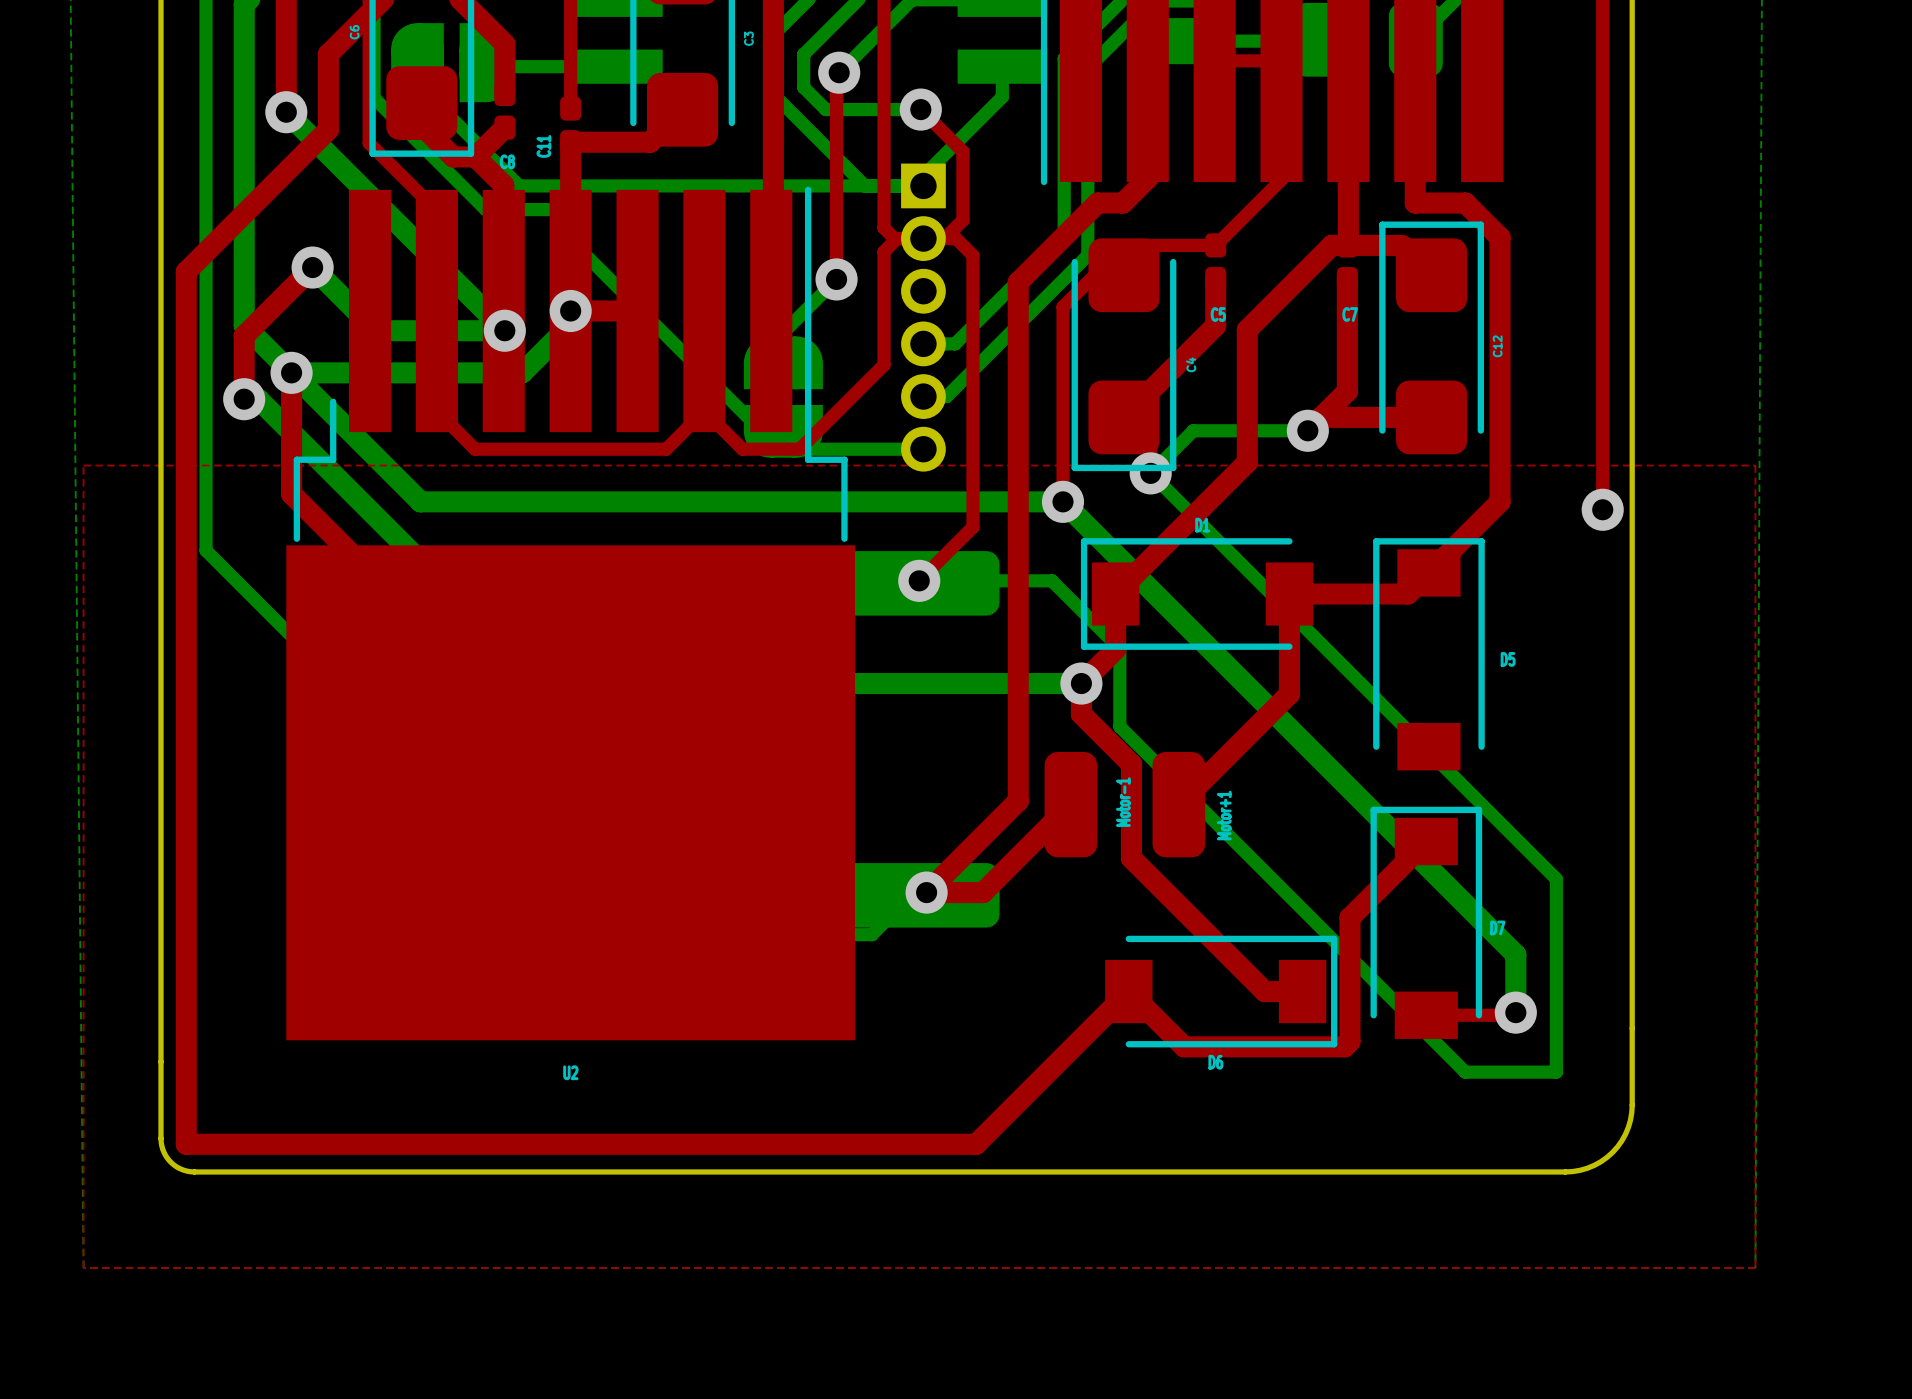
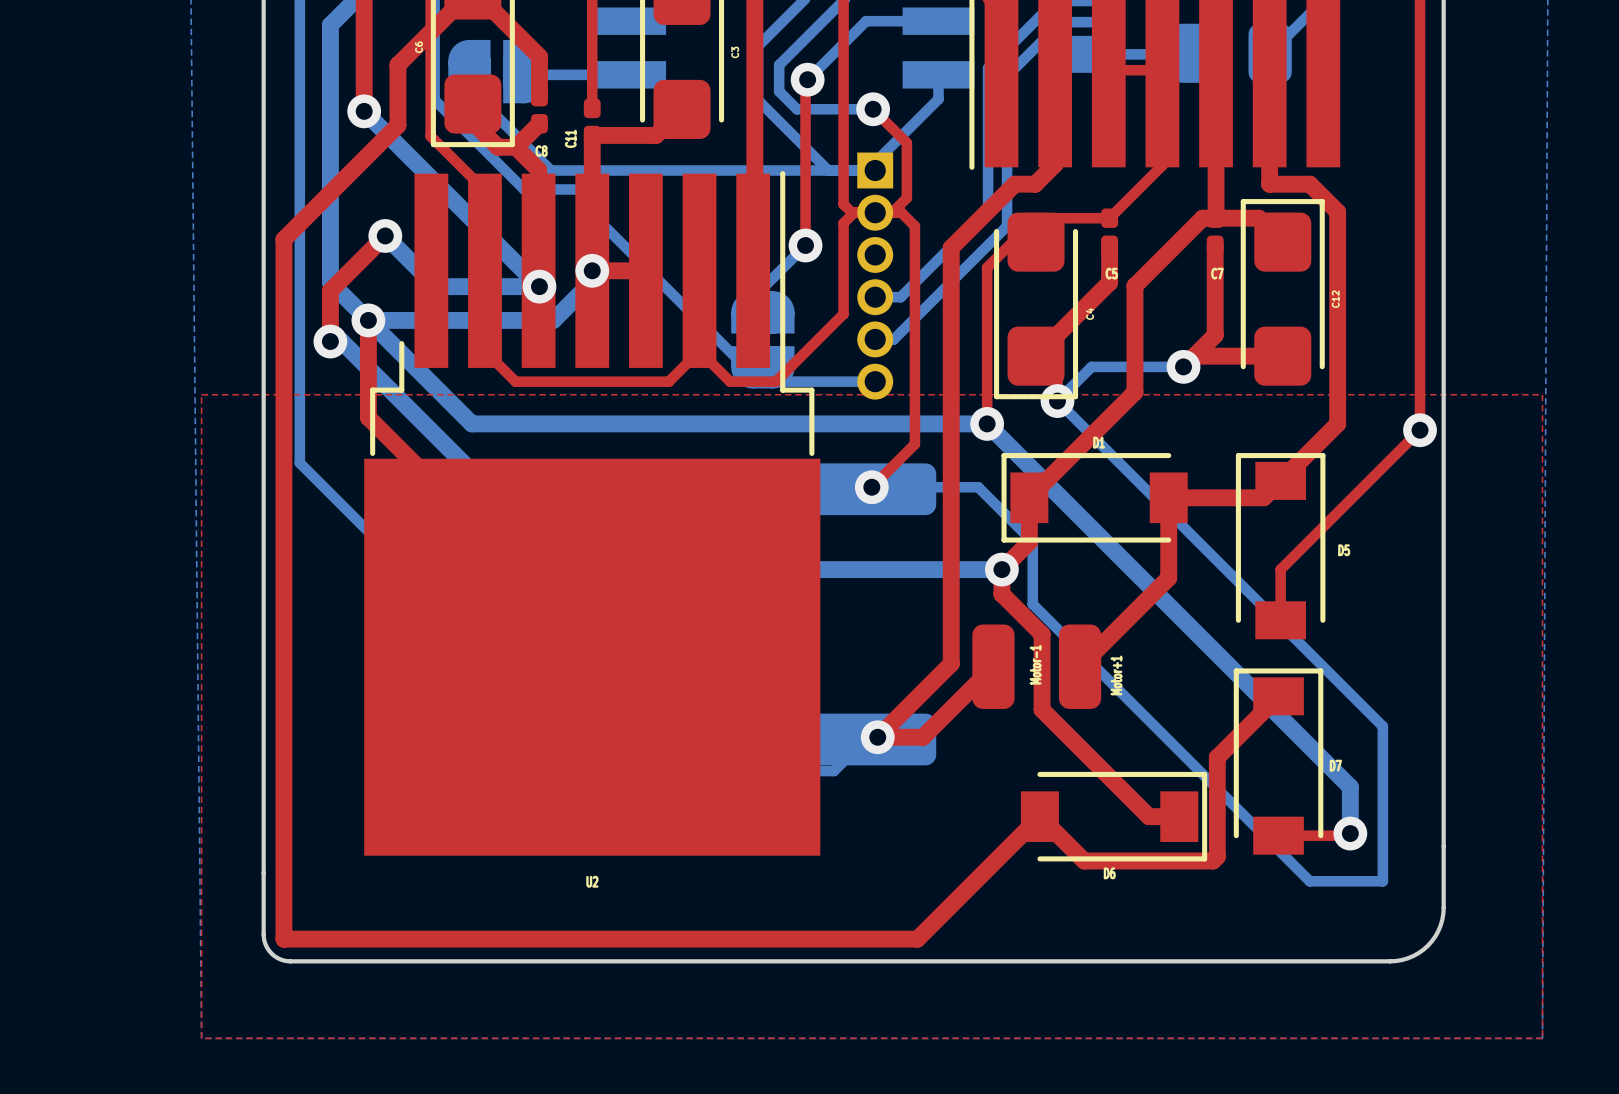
top track: none -> (1420, 430) (1280, 569) (1280, 620)

